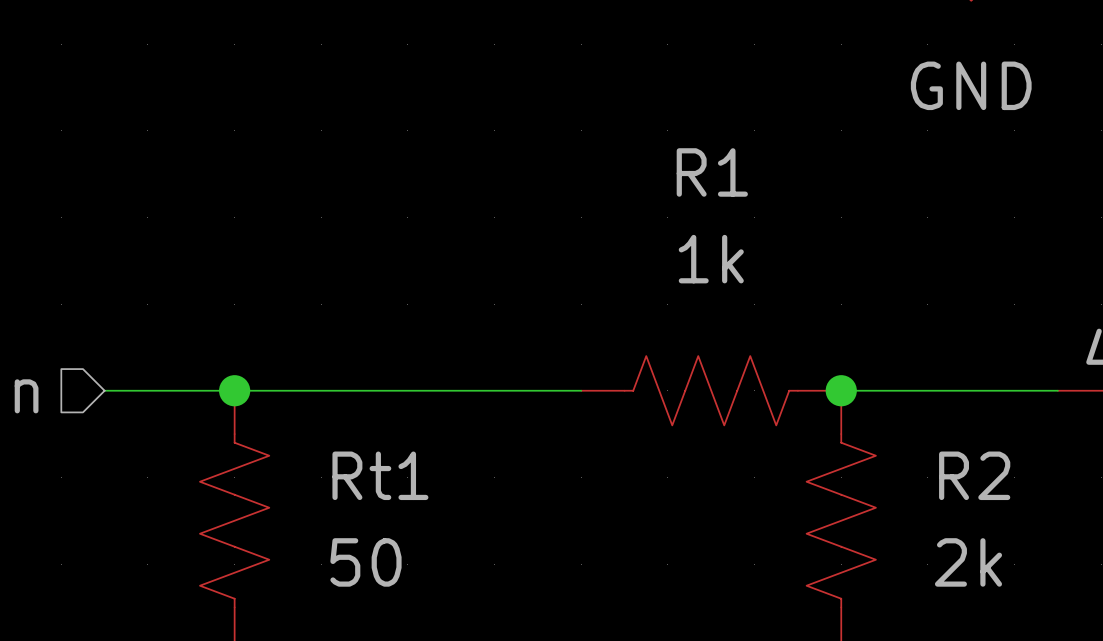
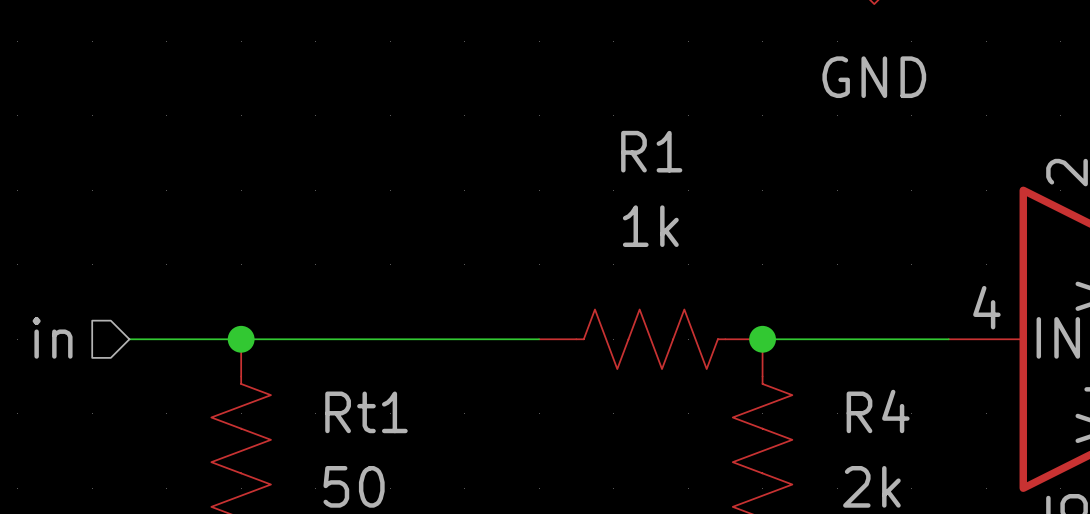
R2 name: R2 (974, 475) -> R4 (878, 411)

